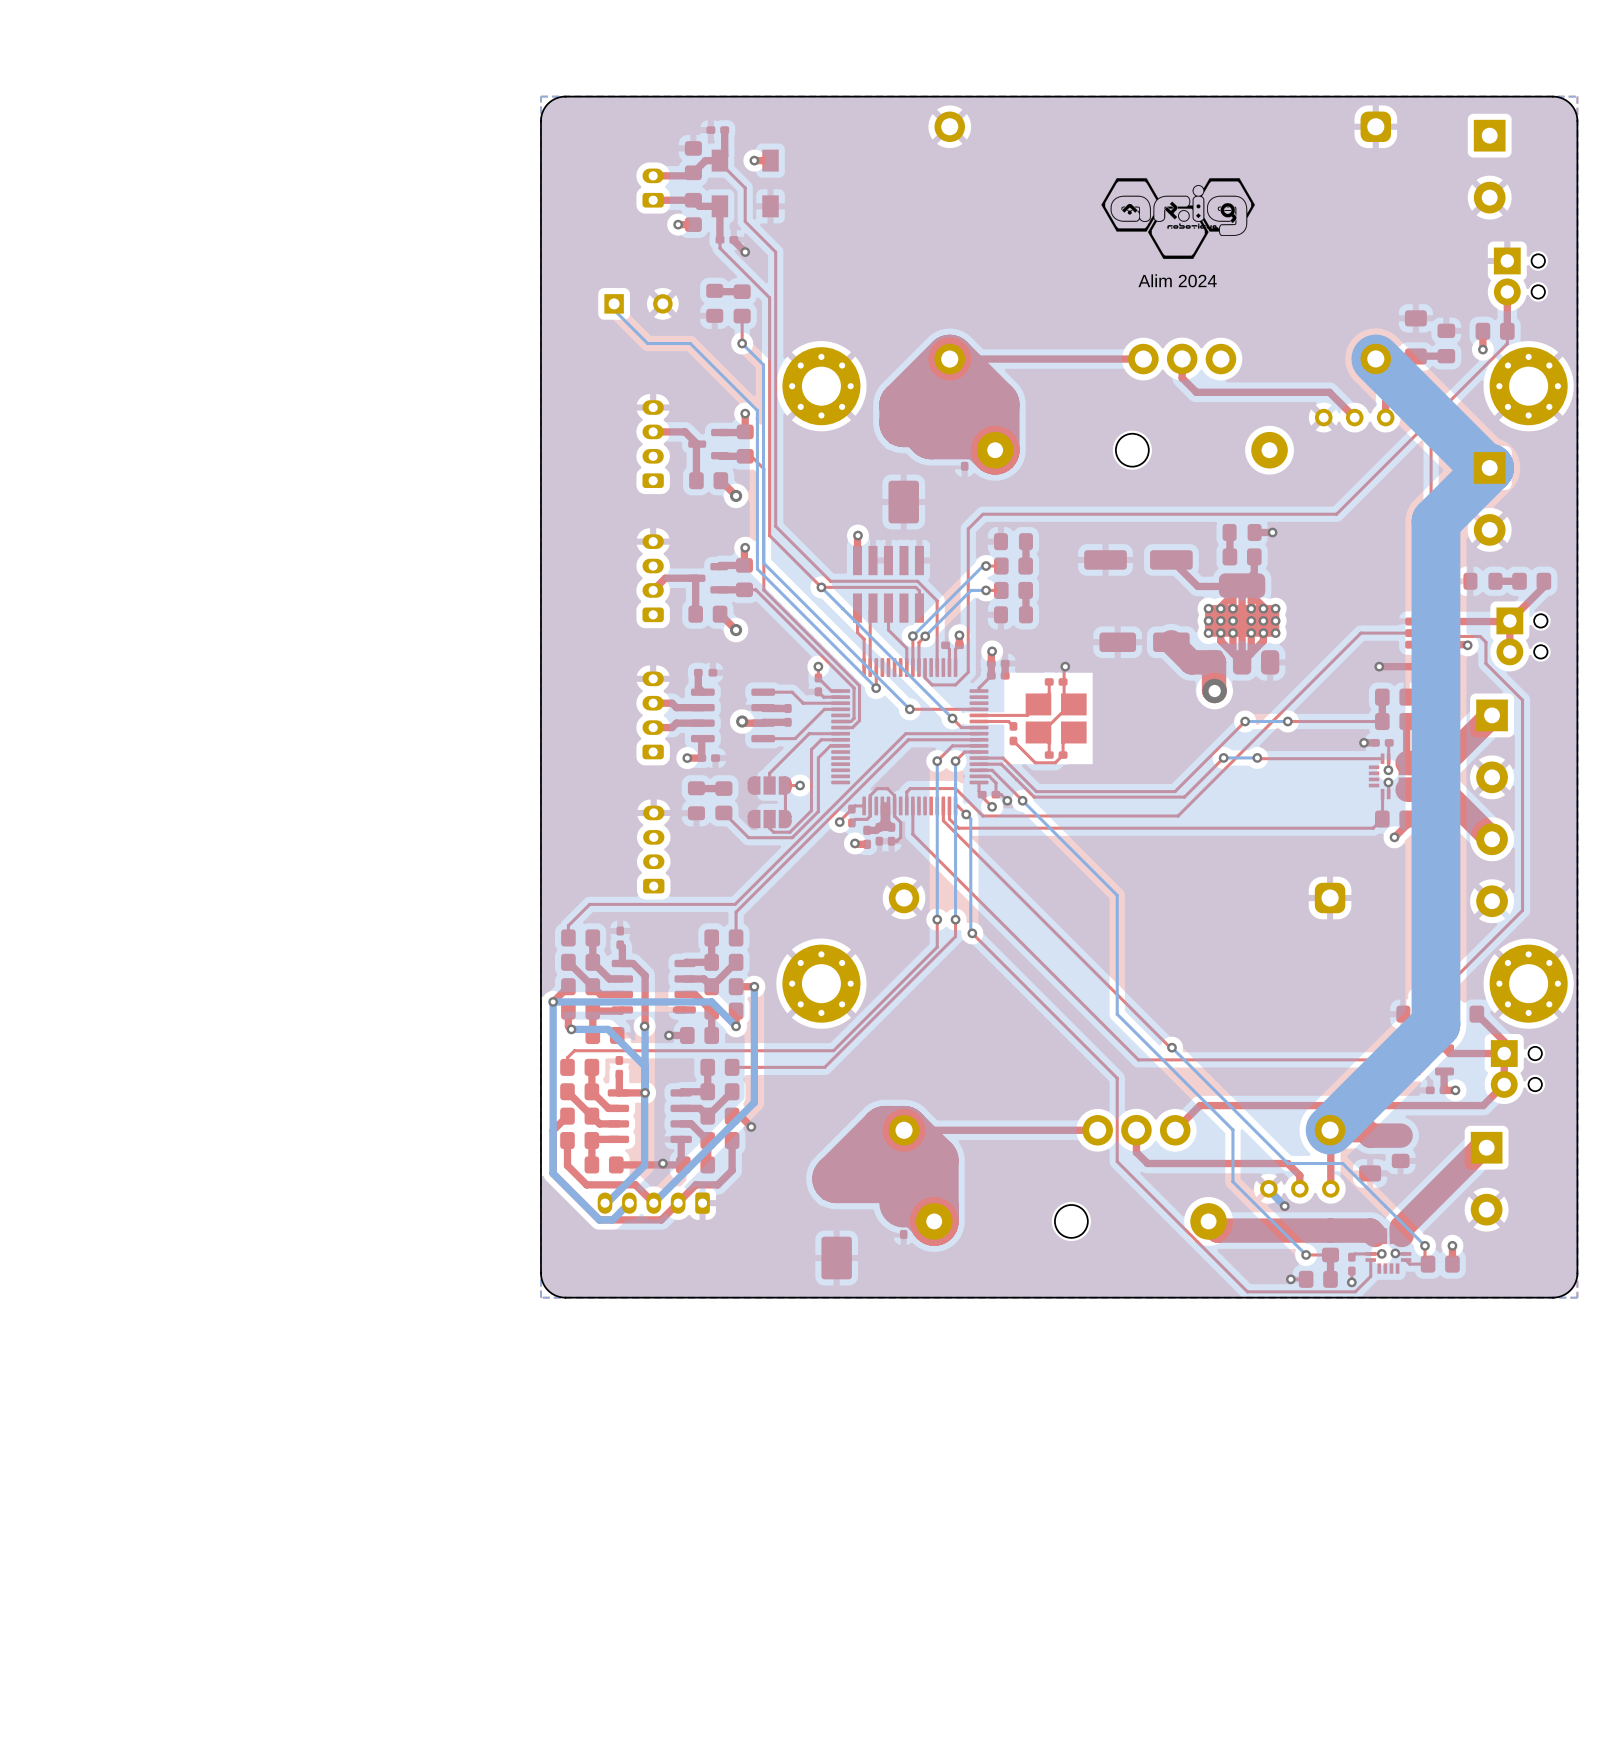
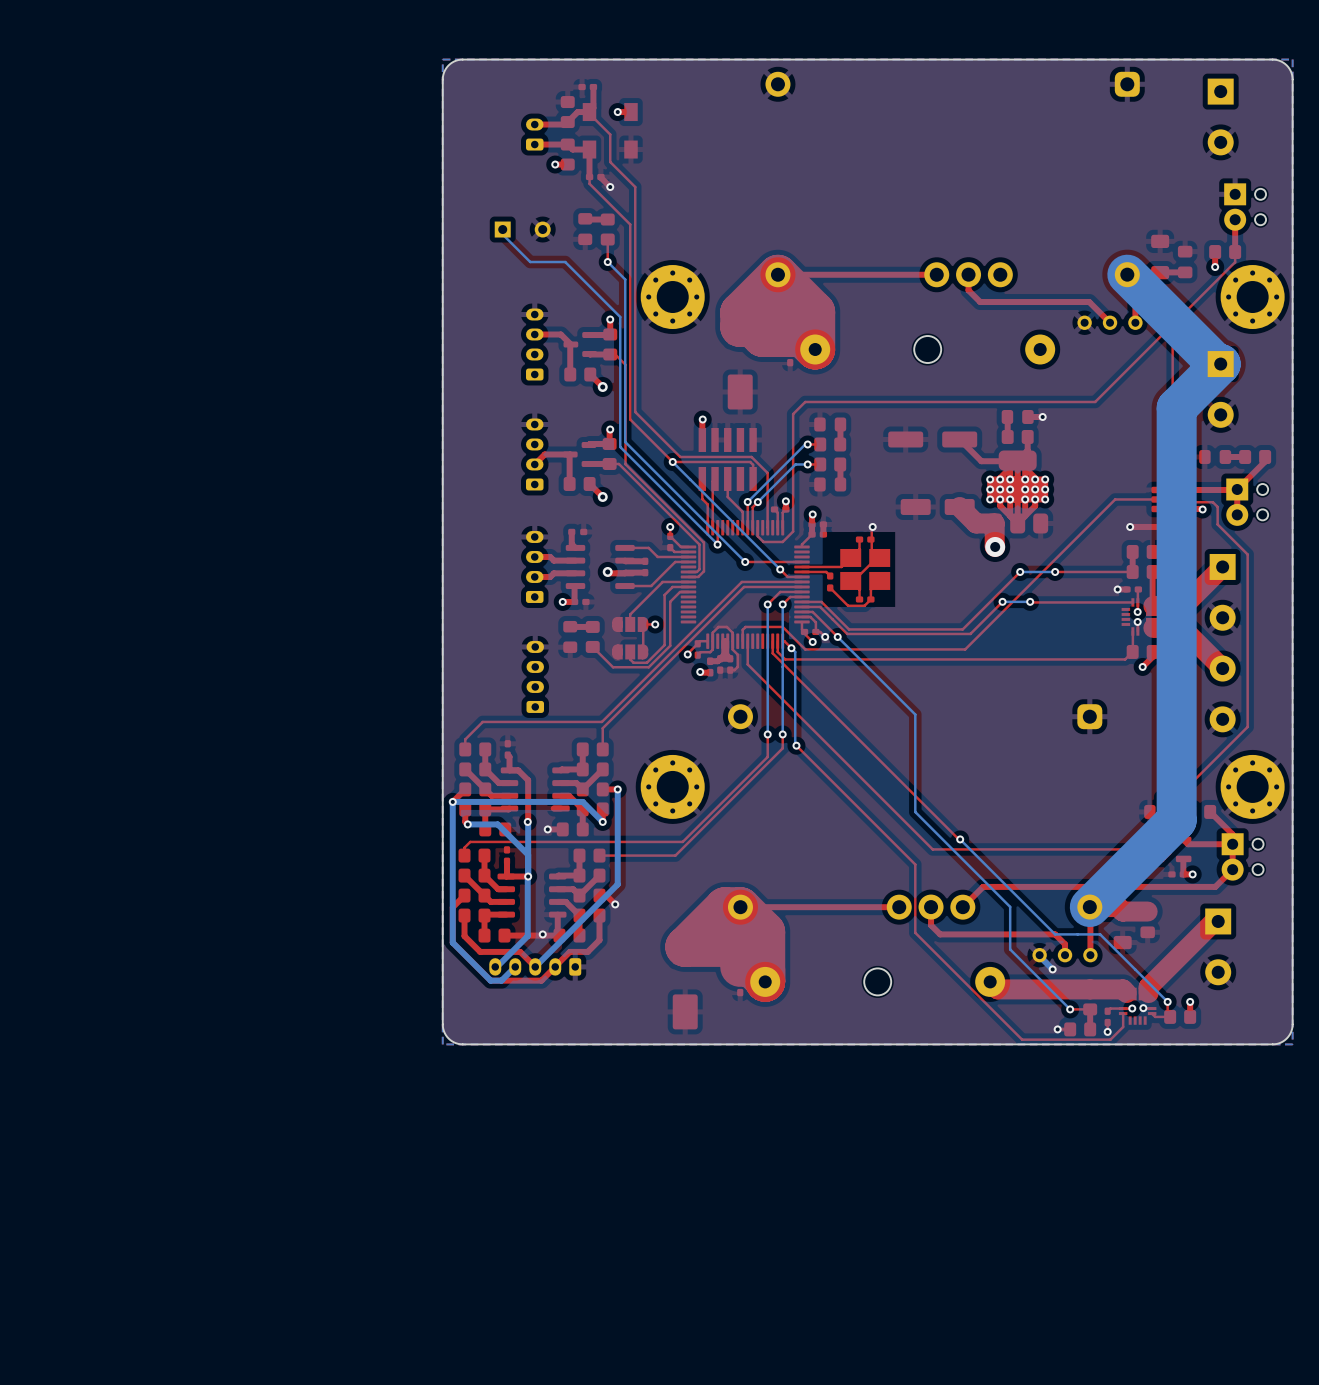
drawing: [1101, 178, 1255, 259] -> none
text: Alim 2024 (1177, 280) -> none

